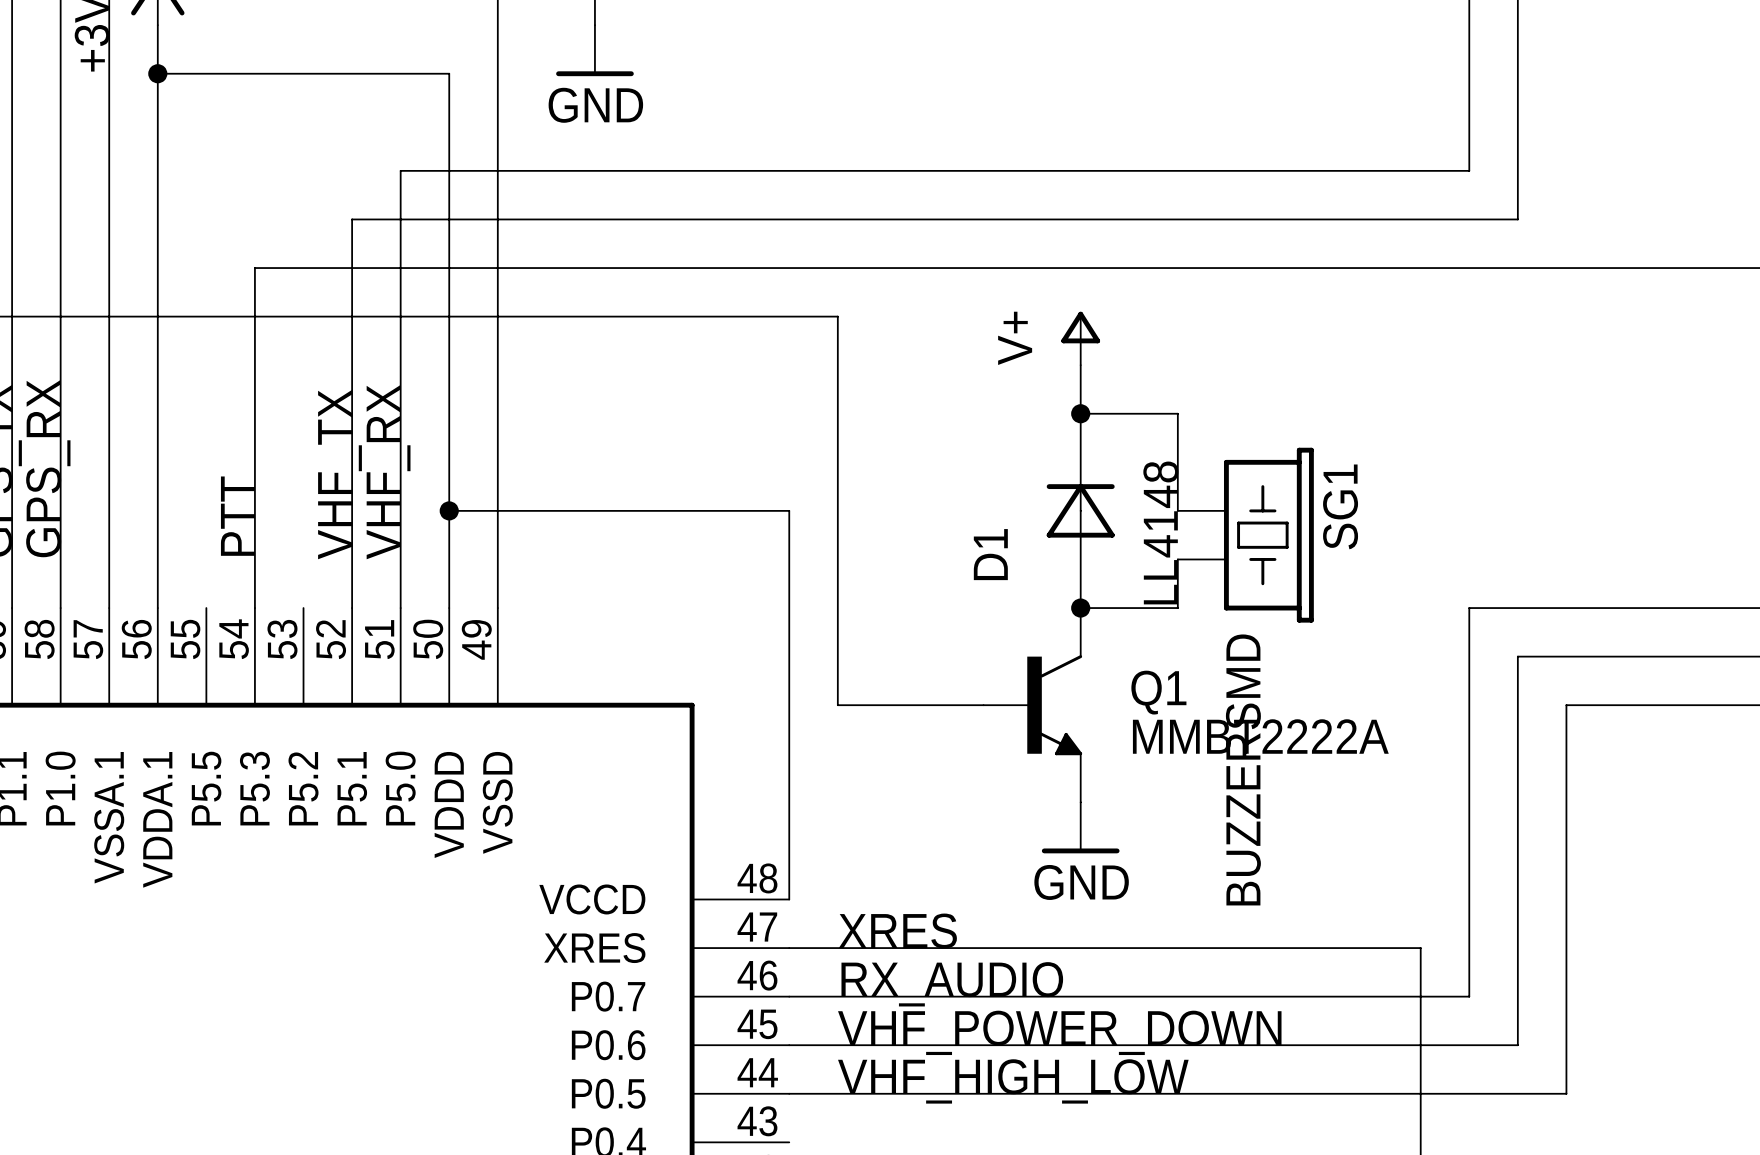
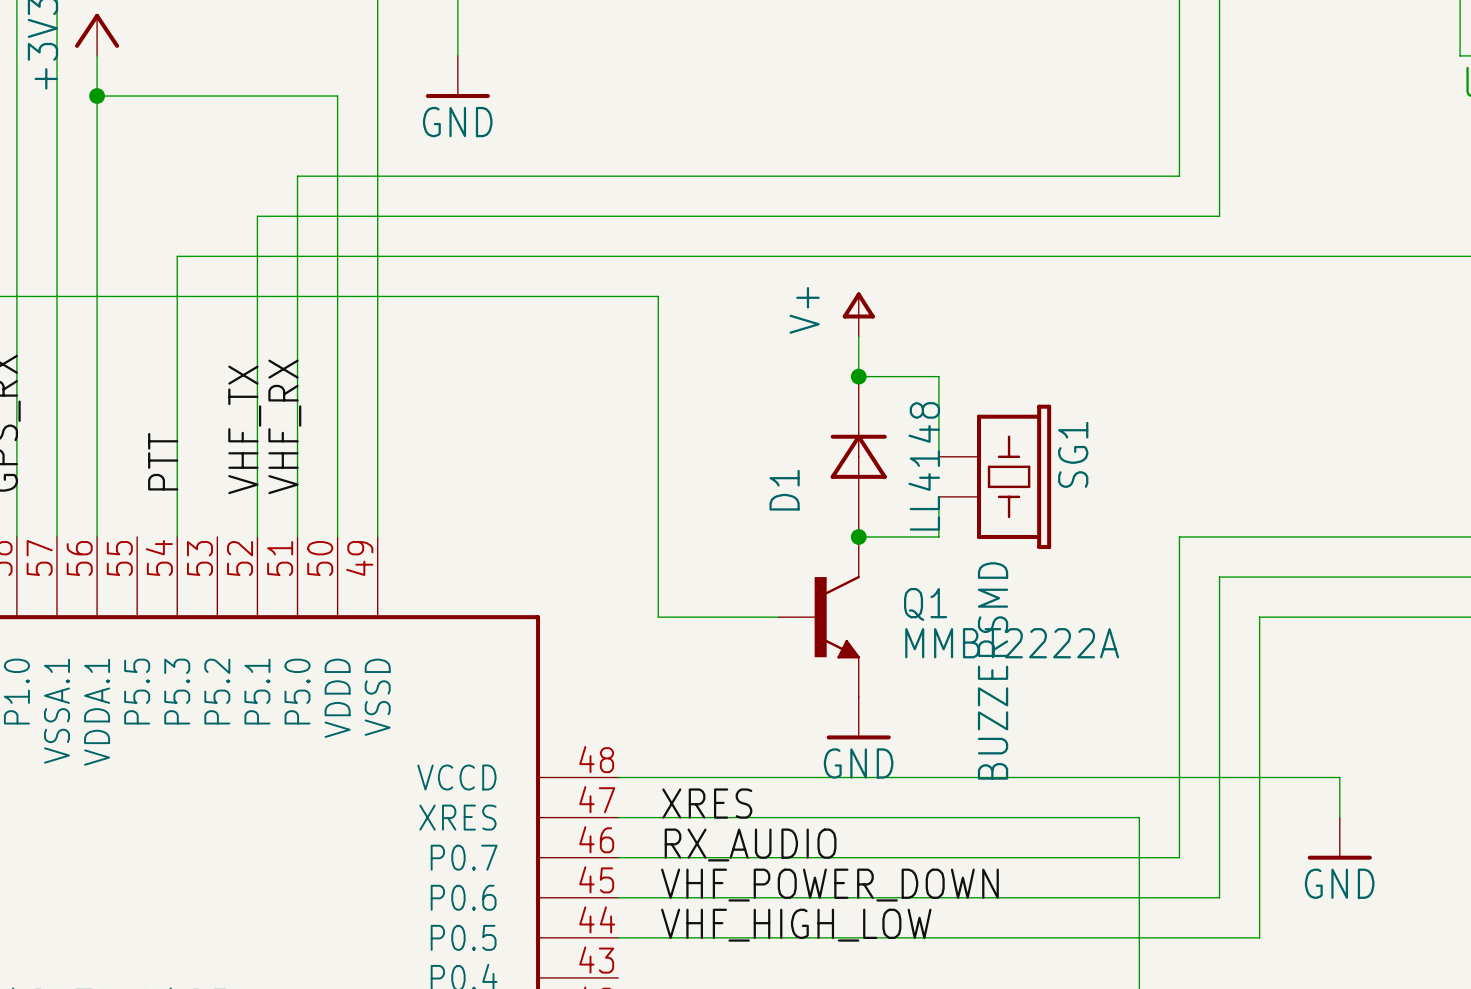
wire: (449, 510) (789, 510) (789, 899) -> (1339, 817) (1339, 777) (618, 777)
junction: (449, 510) -> none
power symbol: none -> GND (1339, 838)

